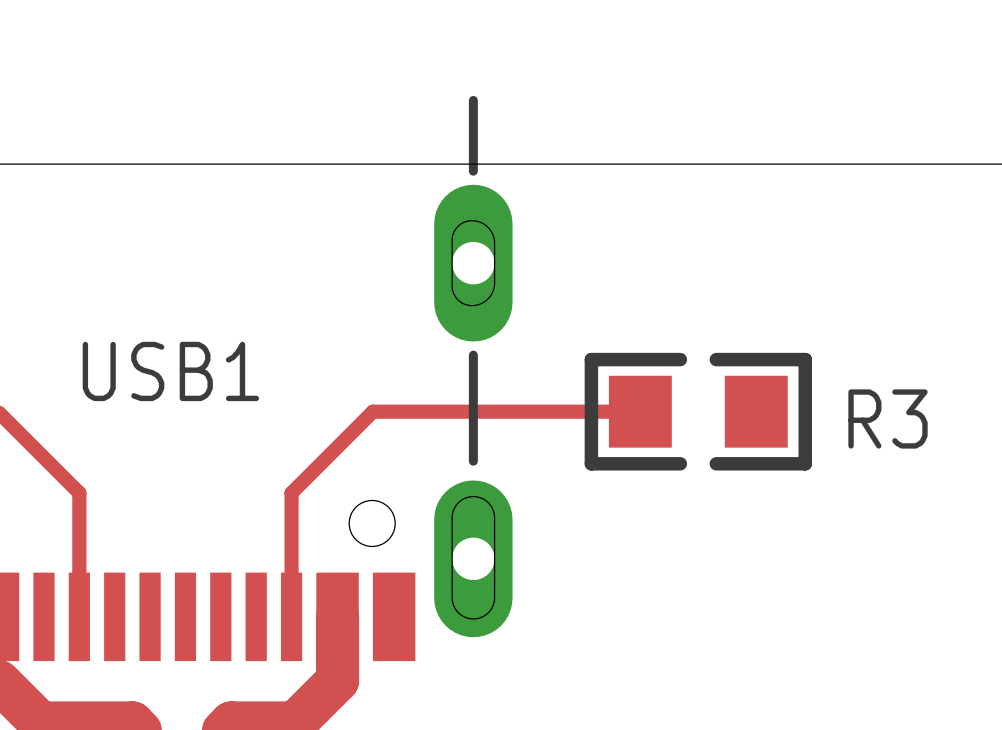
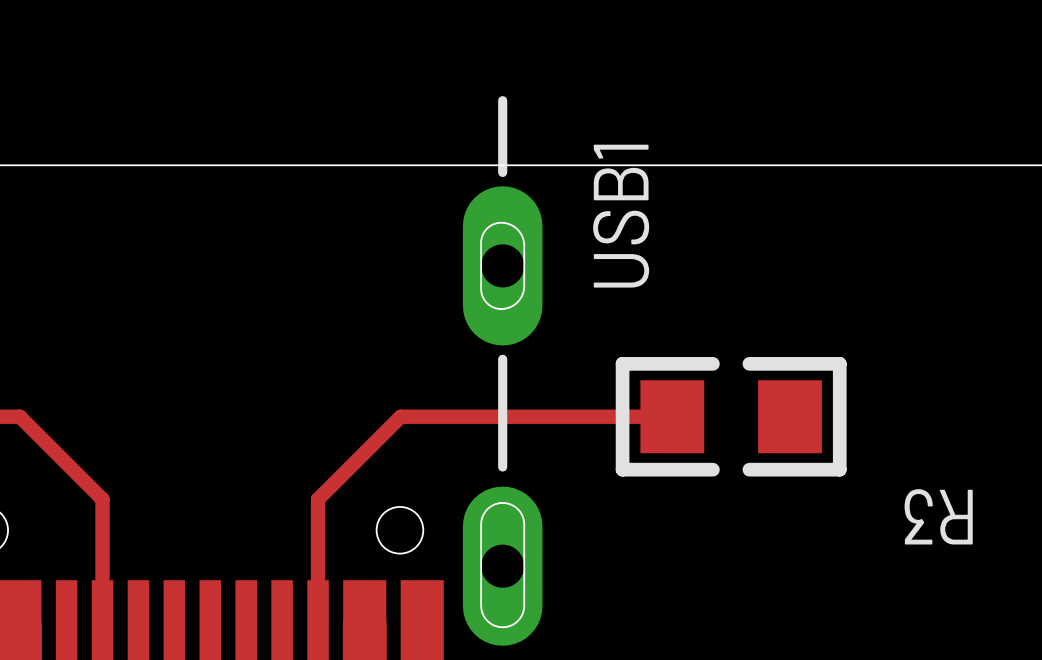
USB1 name rotation: 0° (170, 371) -> 90° counterclockwise (621, 216)
USB1 name position: USB1 (170, 371) -> USB1 (621, 216)
R3 name rotation: 0° (888, 418) -> 180° (938, 516)

